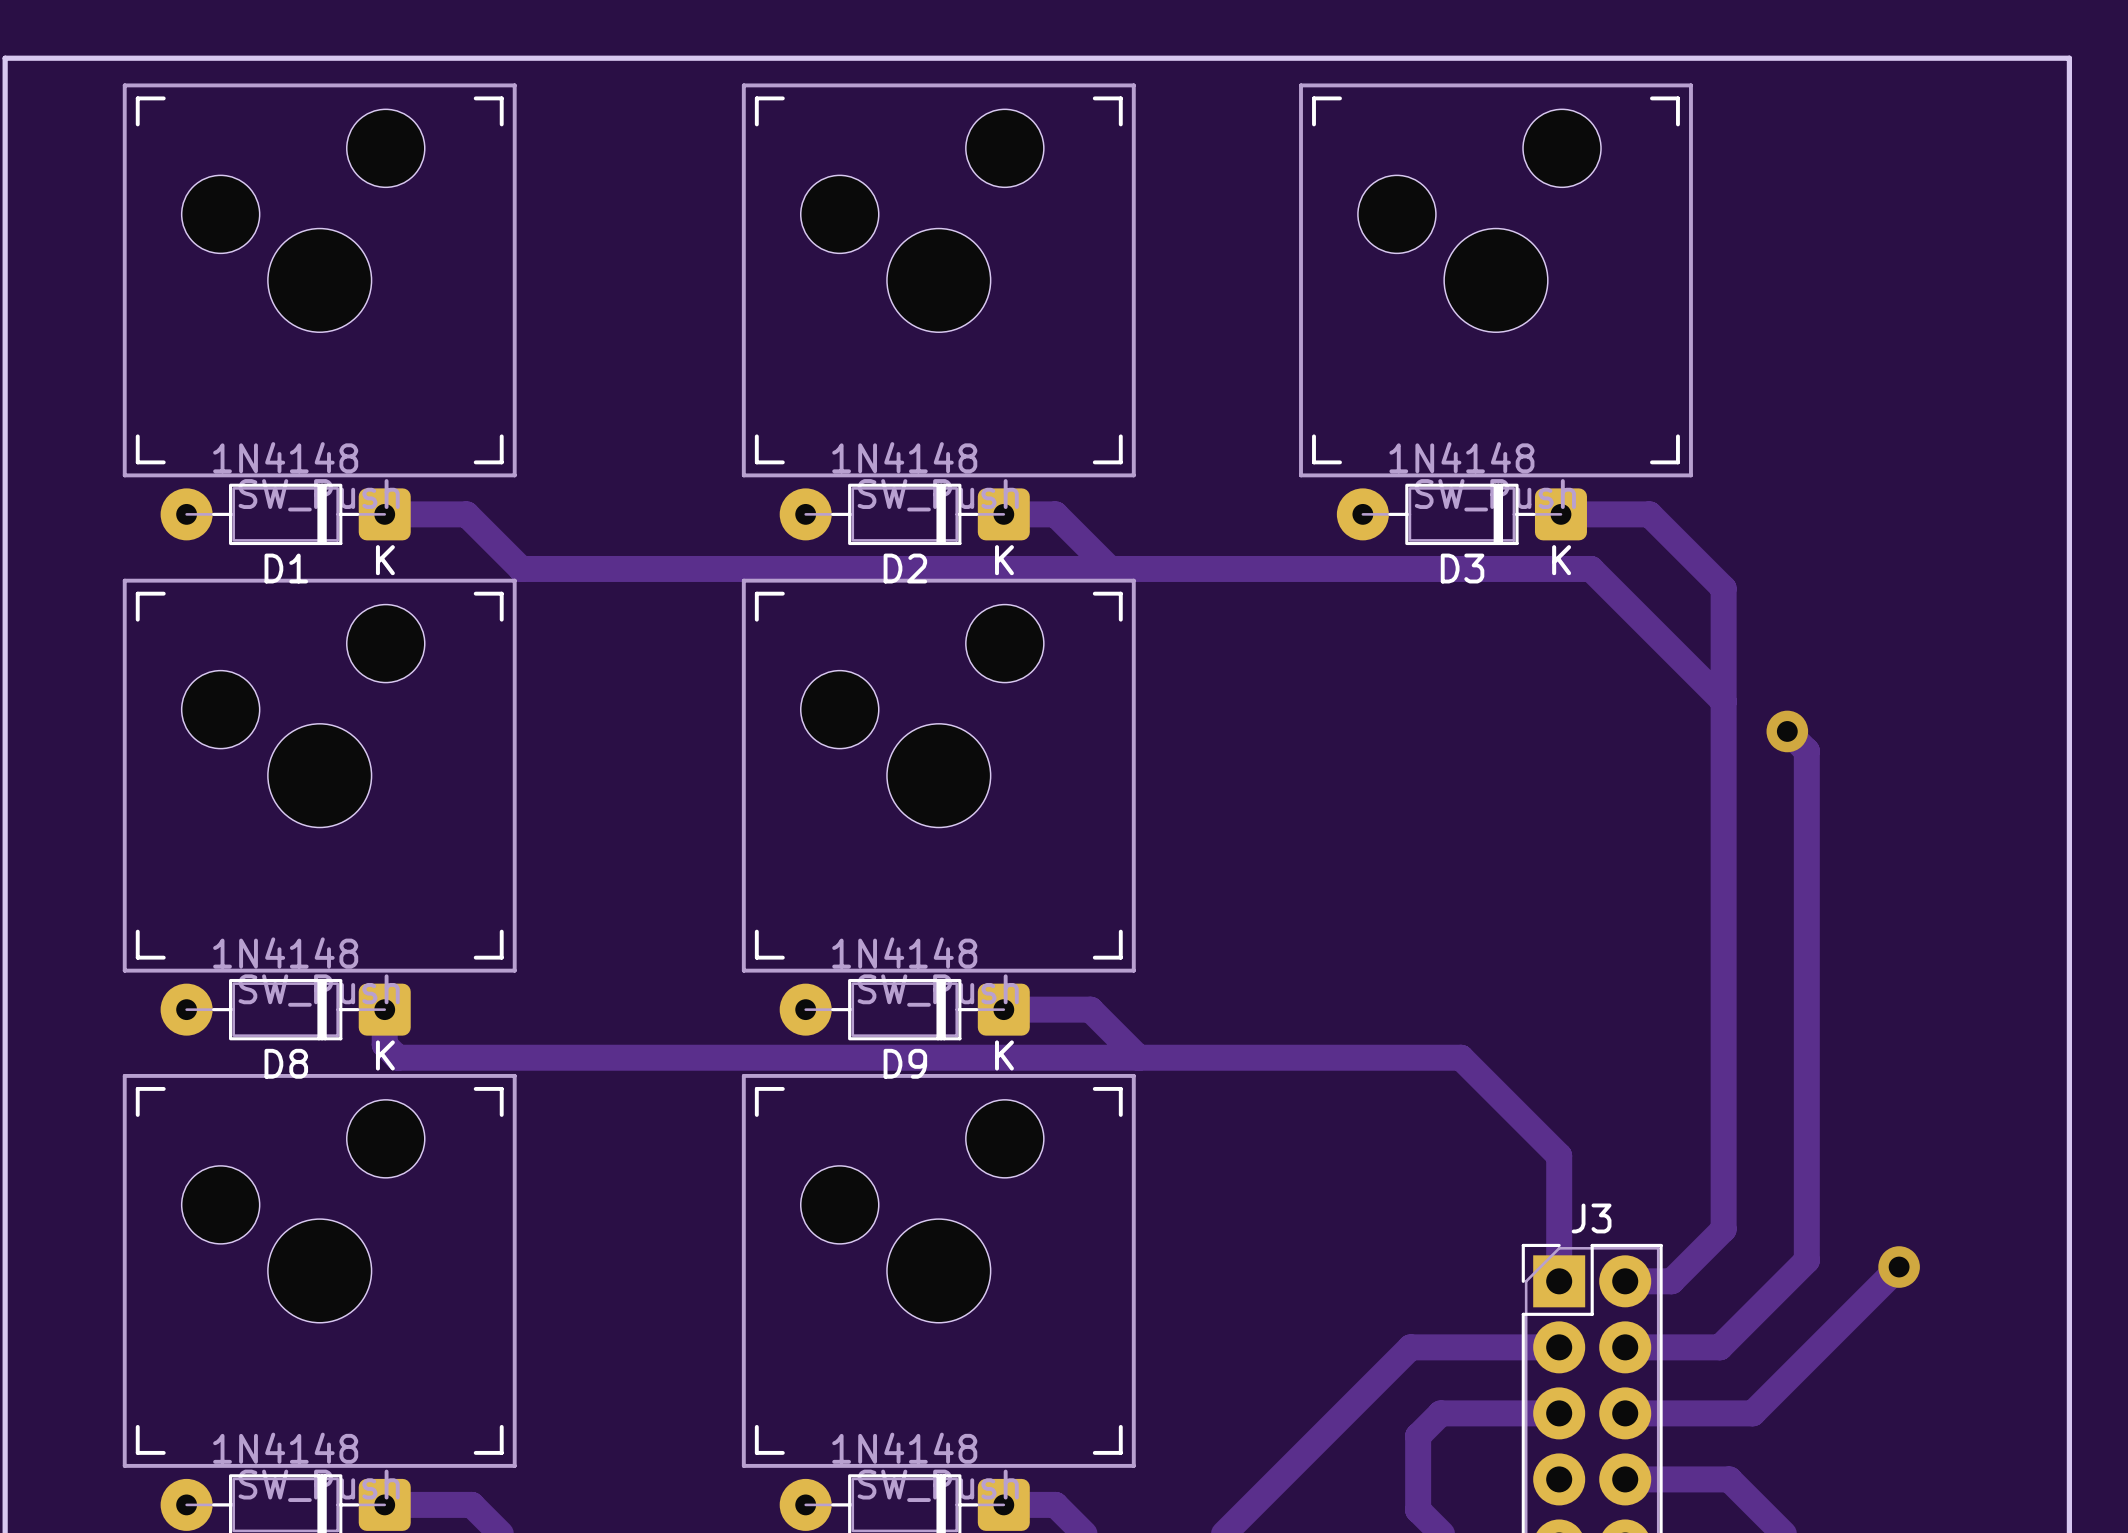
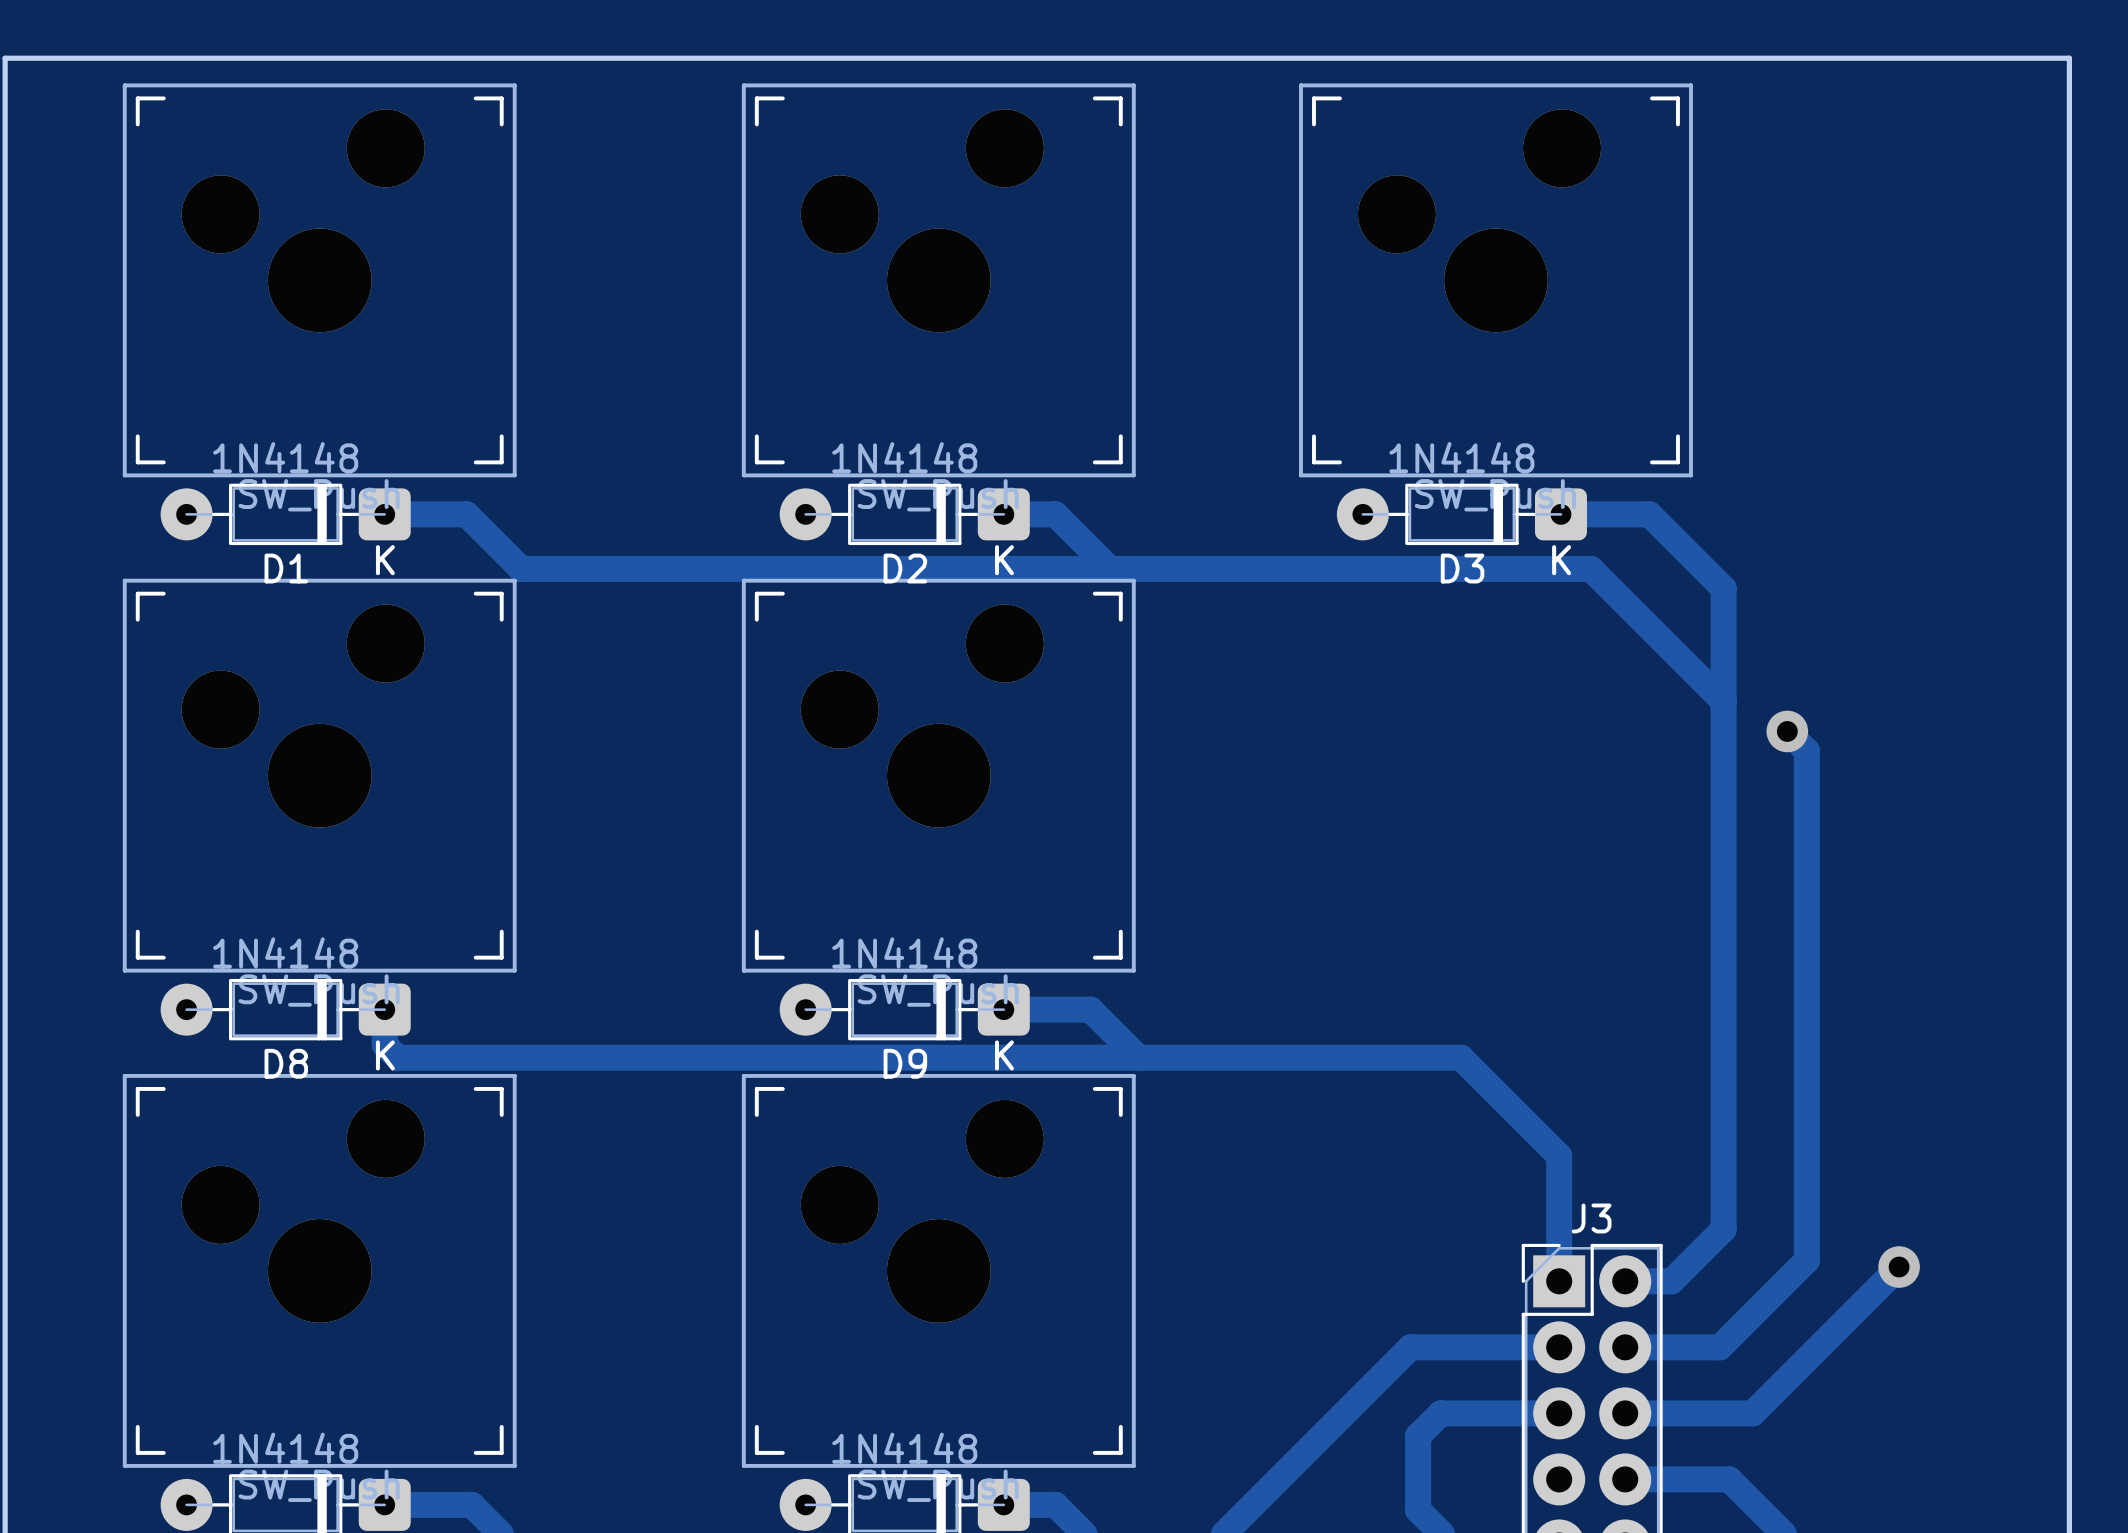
part footprint: [122, 83, 517, 478] -> [122, 83, 517, 478]
part footprint: [741, 83, 1136, 478] -> [741, 83, 1136, 478]
part footprint: [1299, 83, 1693, 478] -> [1299, 83, 1693, 478]
part footprint: [122, 578, 517, 973] -> [122, 578, 517, 973]
part footprint: [741, 578, 1136, 973] -> [741, 578, 1136, 973]
part footprint: [122, 1073, 517, 1468] -> [122, 1073, 517, 1468]
part footprint: [741, 1073, 1136, 1468] -> [741, 1073, 1136, 1468]

